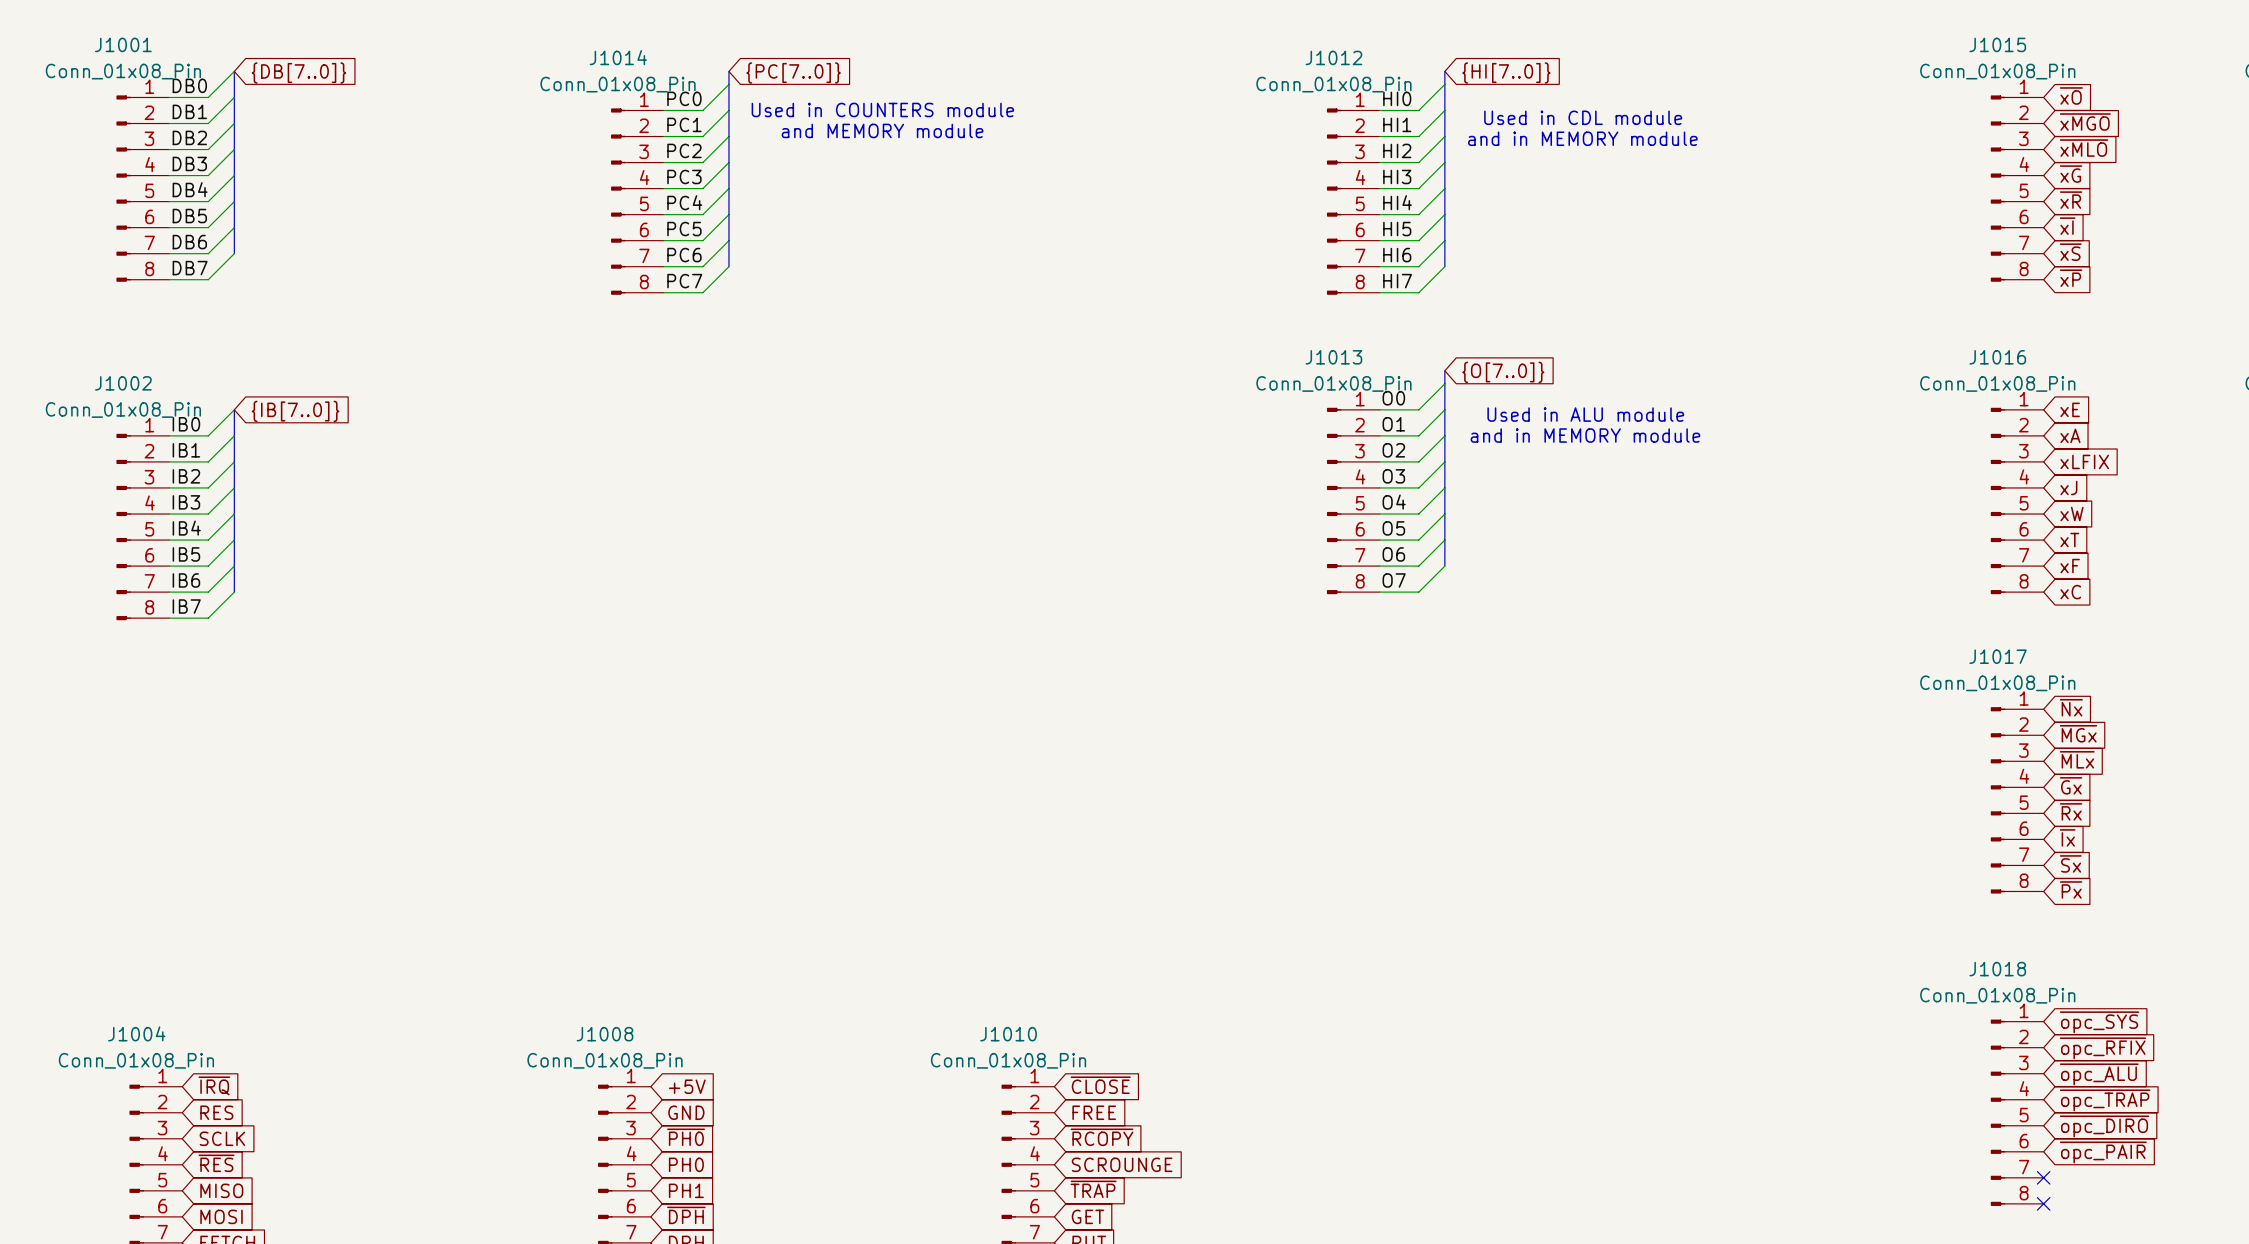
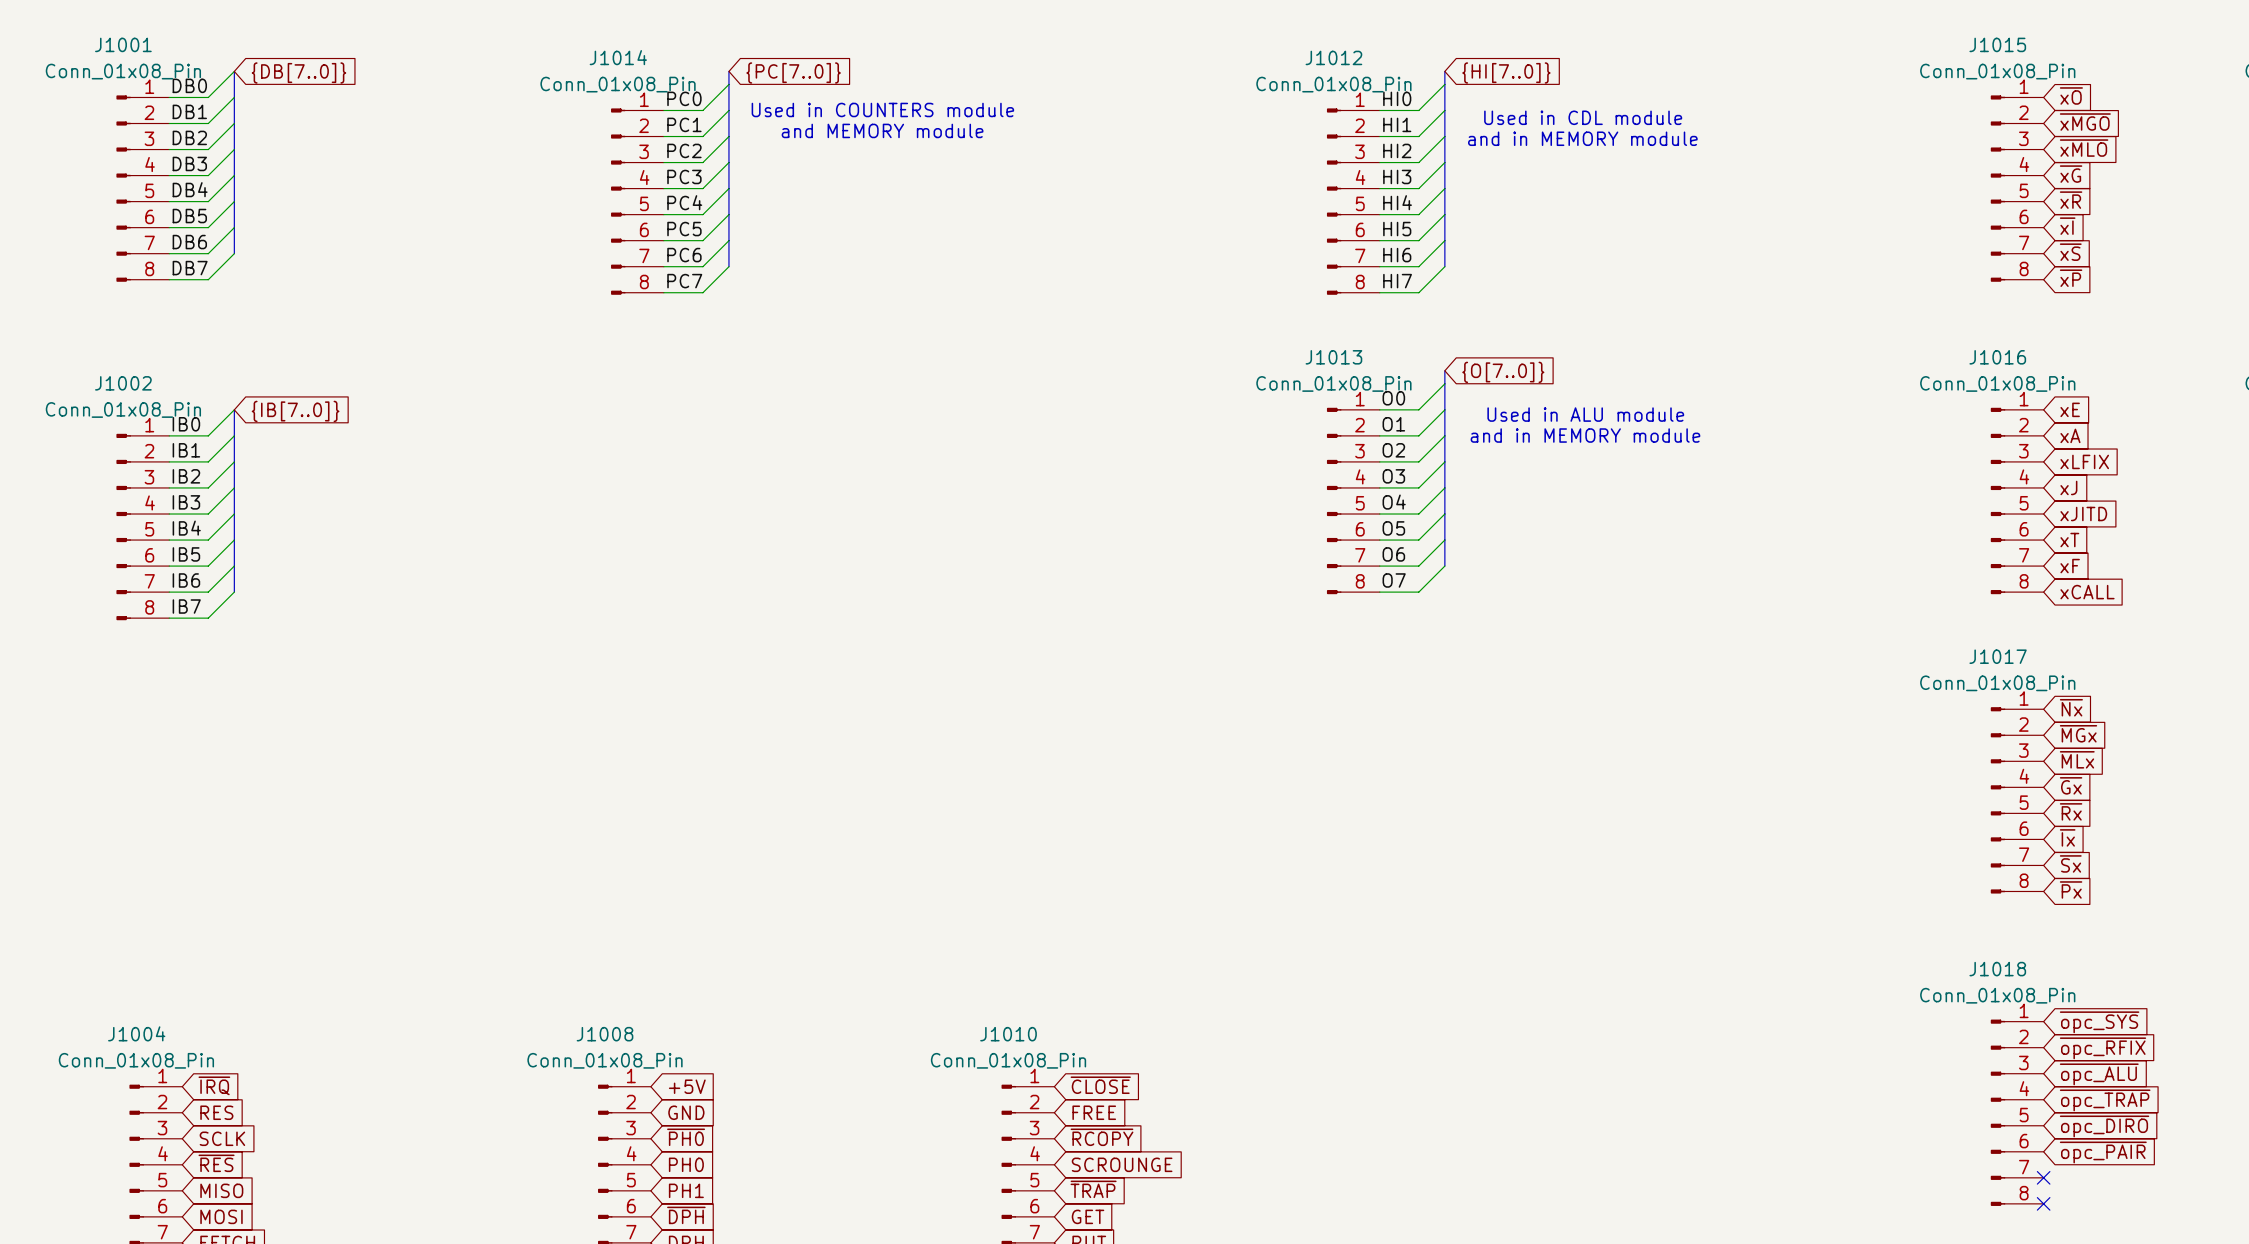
global label: xW (2072, 514) -> xJITD (2083, 514)
global label: xC (2070, 592) -> xCALL (2087, 592)

